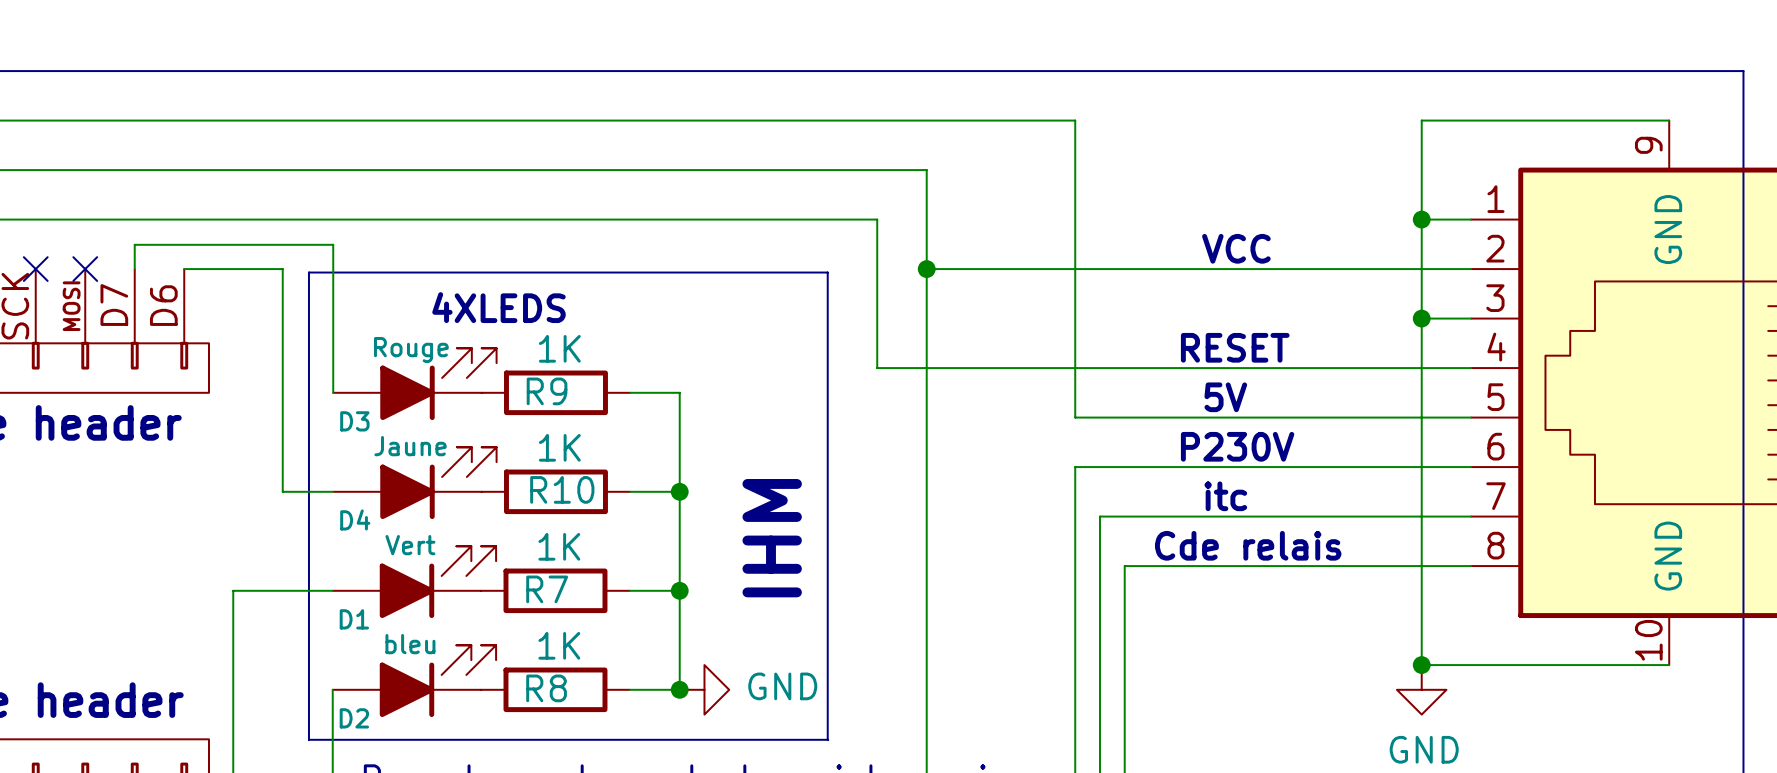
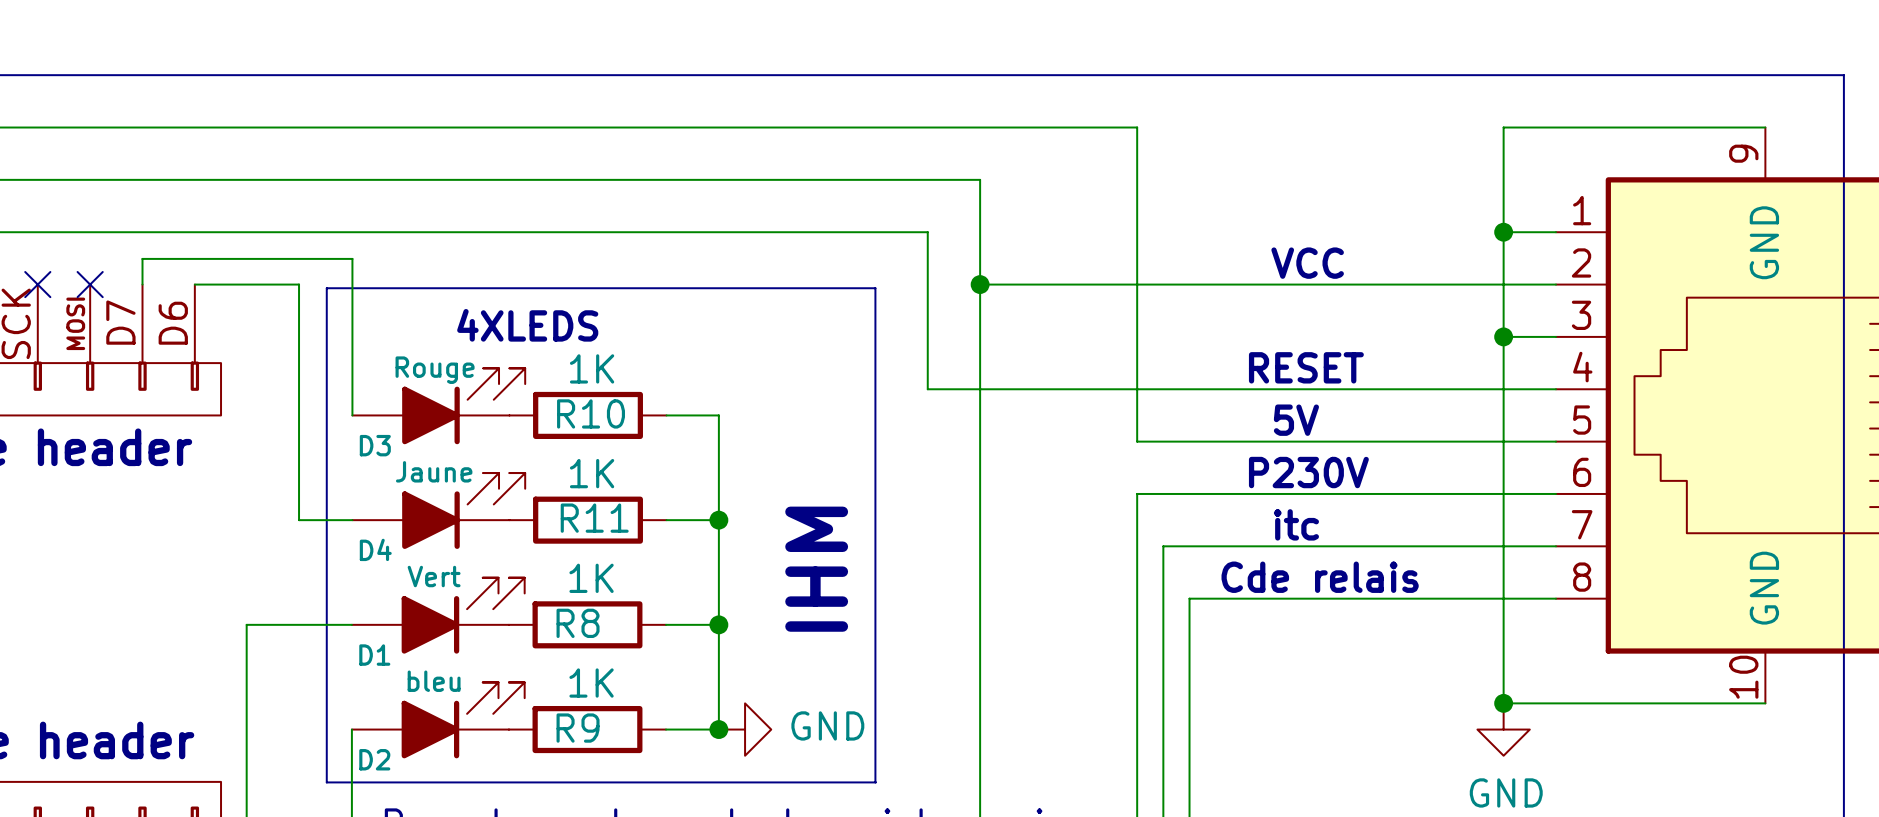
R9 name: R9 (547, 391) -> R10 (591, 413)
R10 name: R10 (562, 489) -> R11 (594, 518)
R7 name: R7 (547, 589) -> R8 (578, 623)
R8 name: R8 (546, 688) -> R9 (578, 728)

